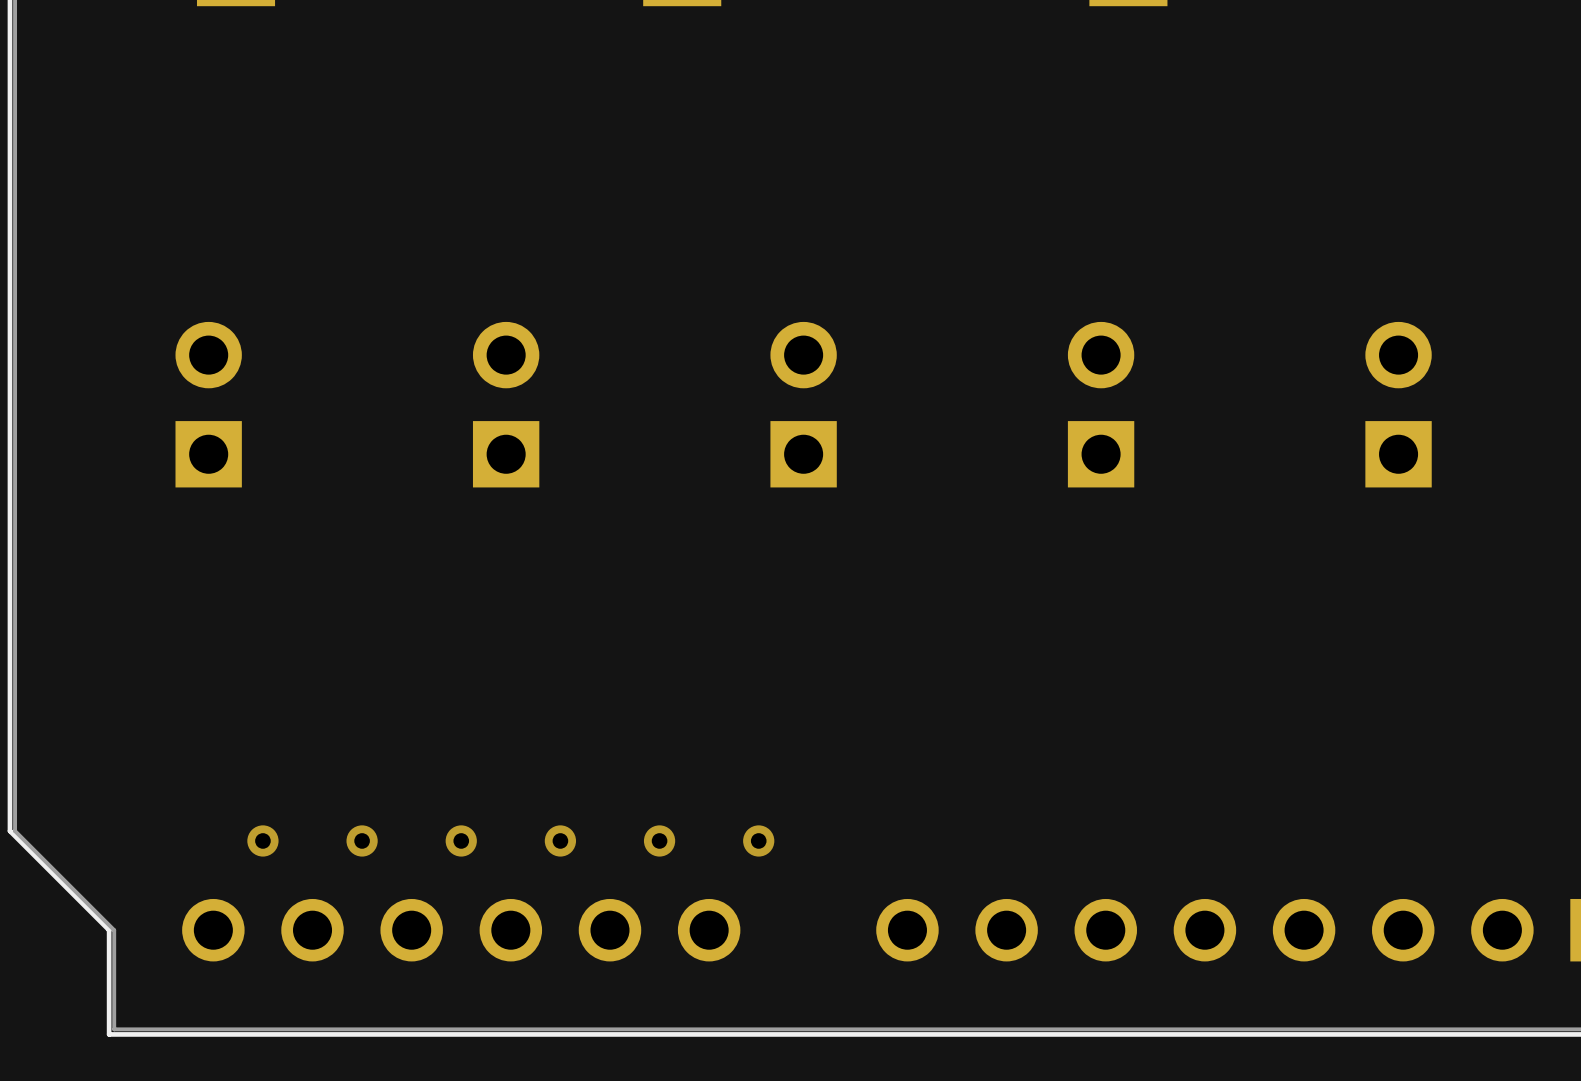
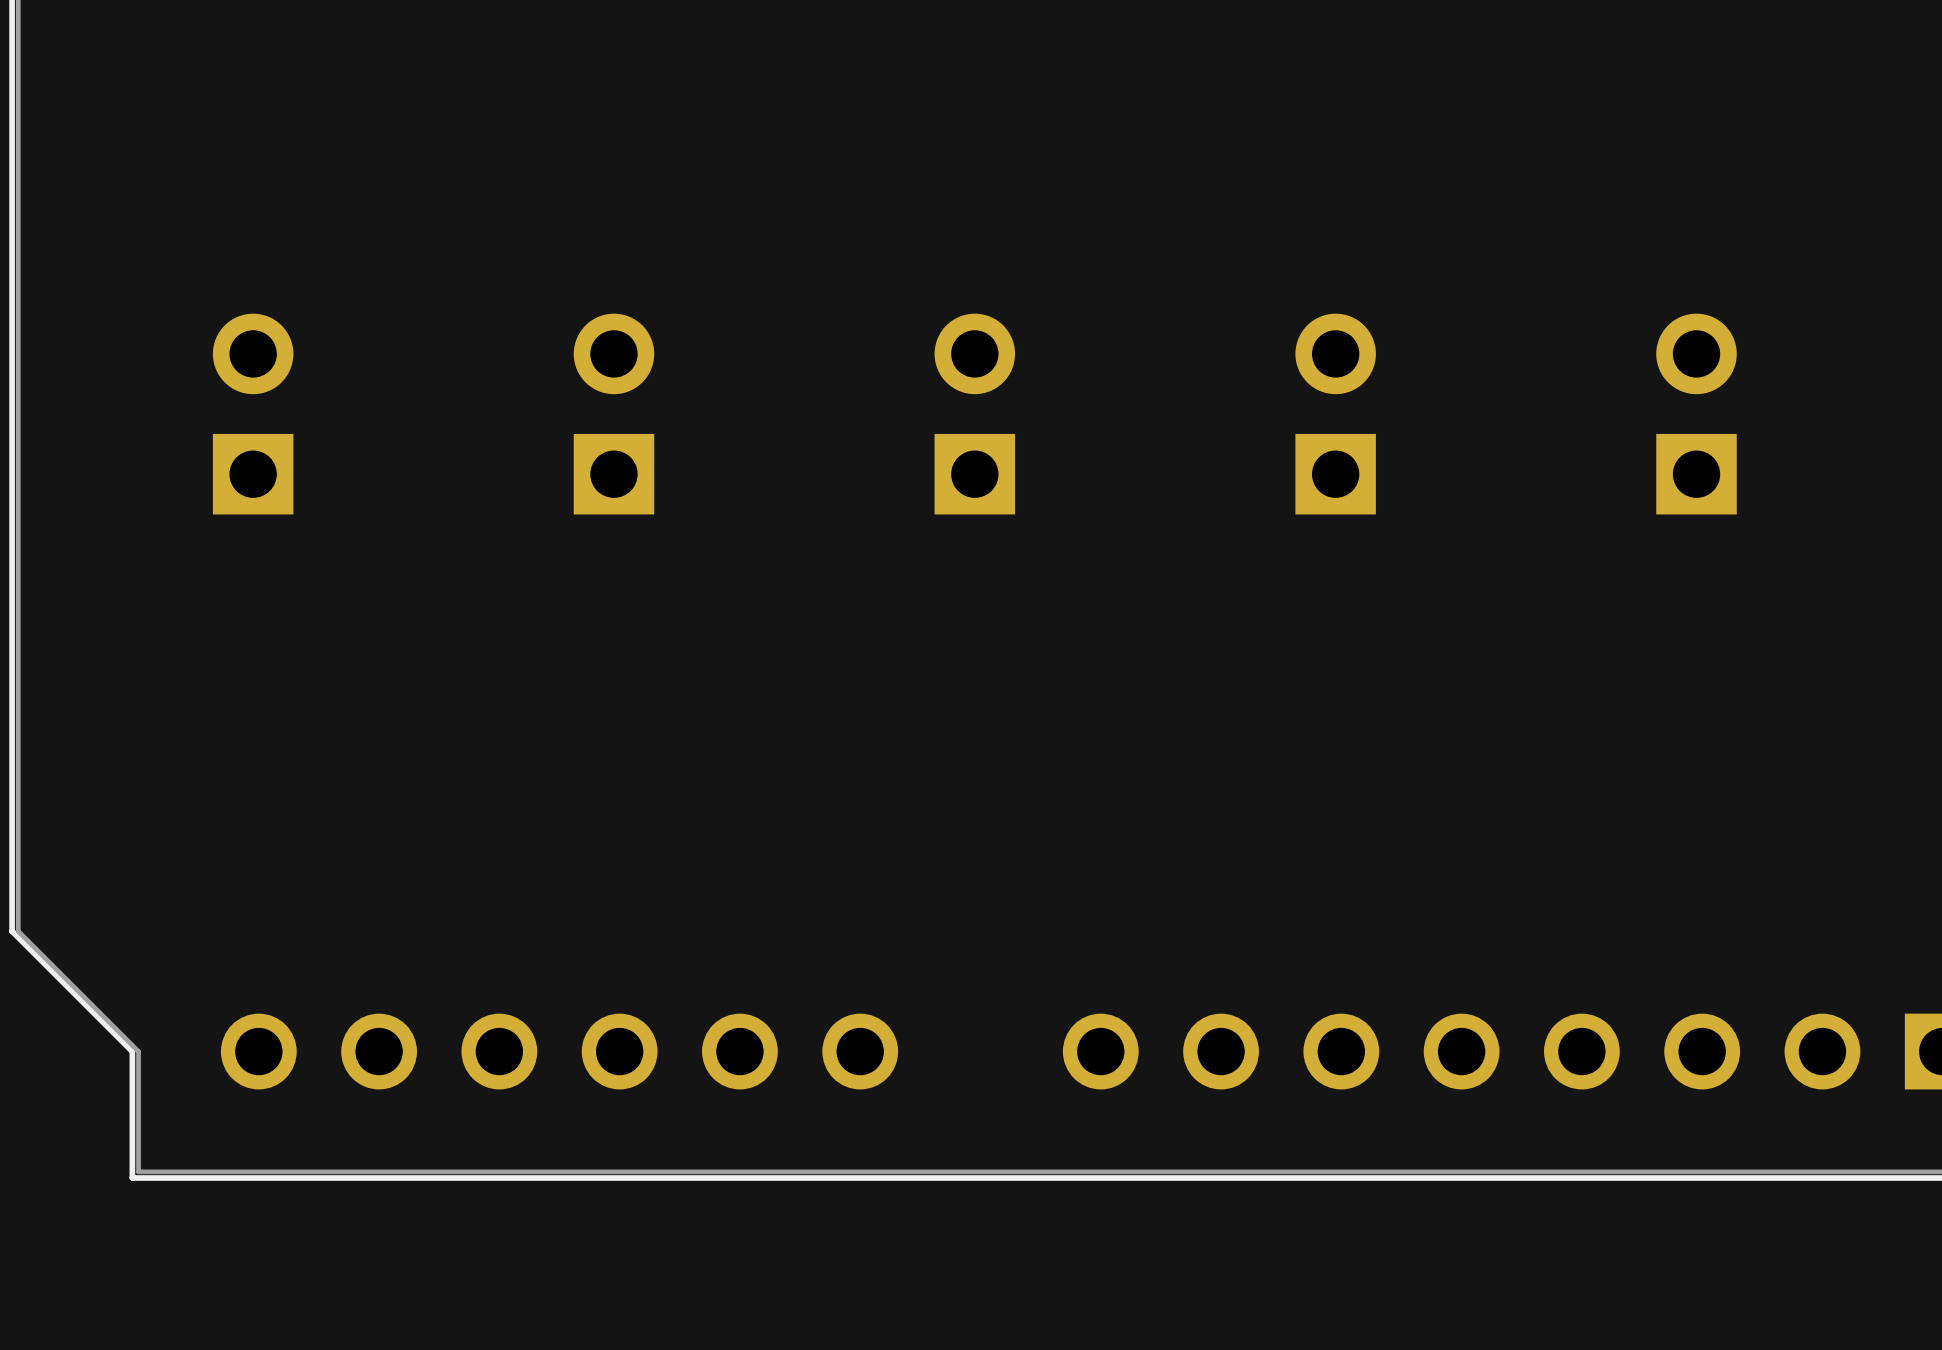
via: (262, 840) -> none
via: (362, 840) -> none
via: (461, 840) -> none
via: (560, 840) -> none
via: (659, 840) -> none
via: (758, 840) -> none

